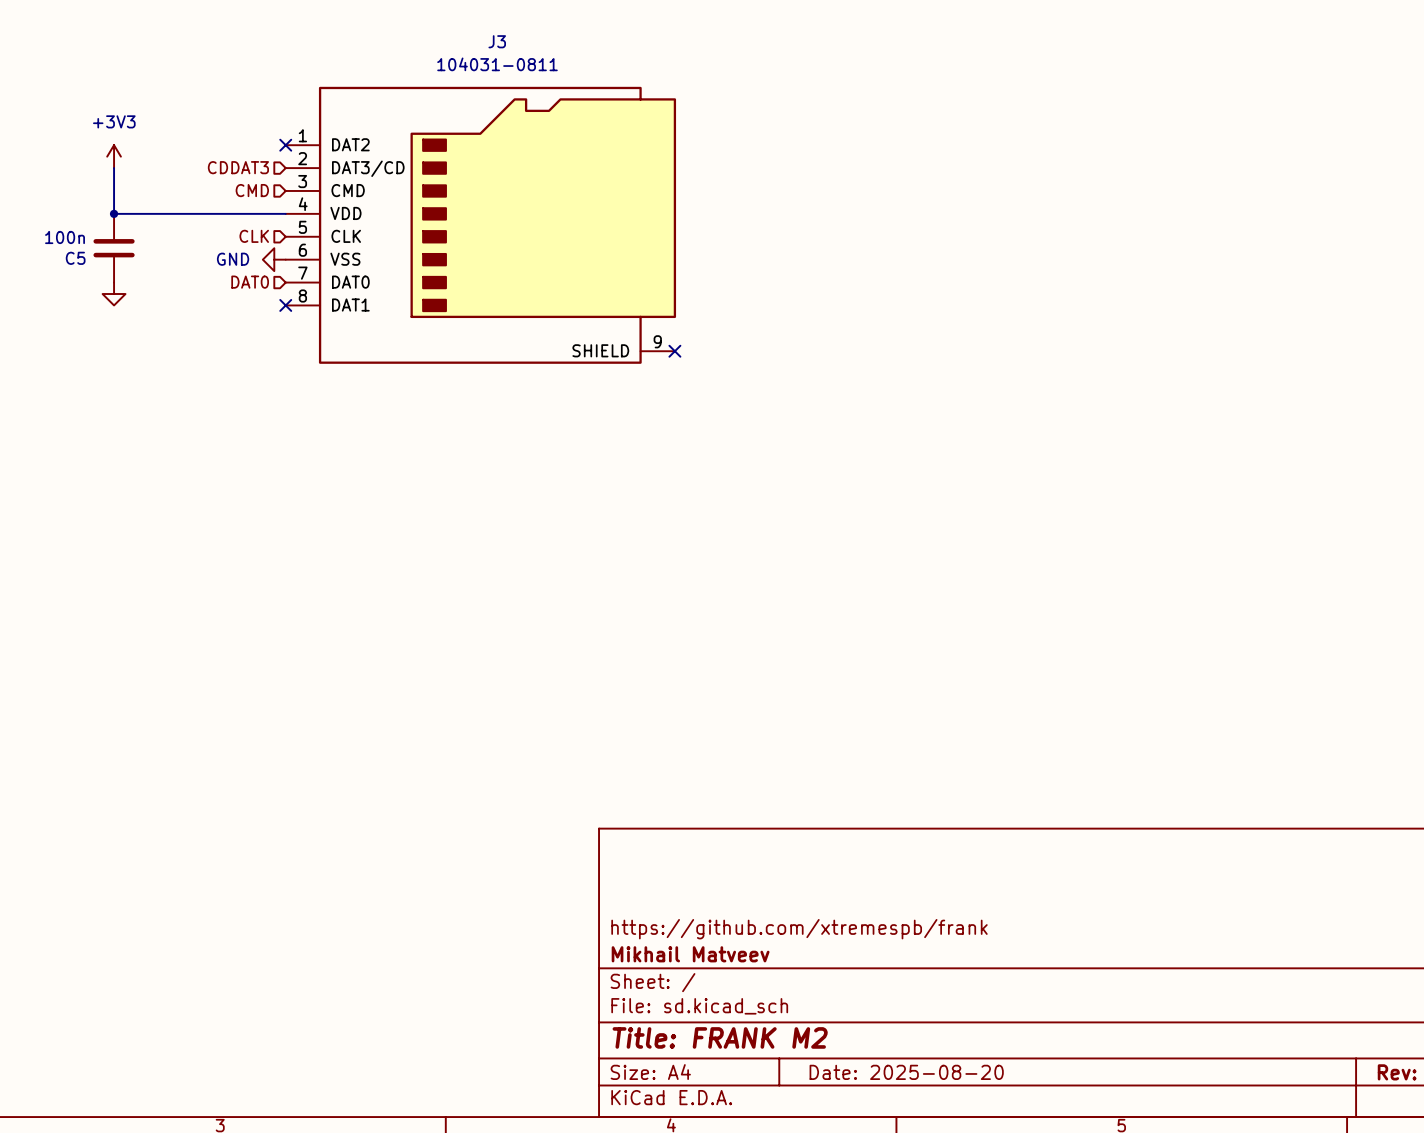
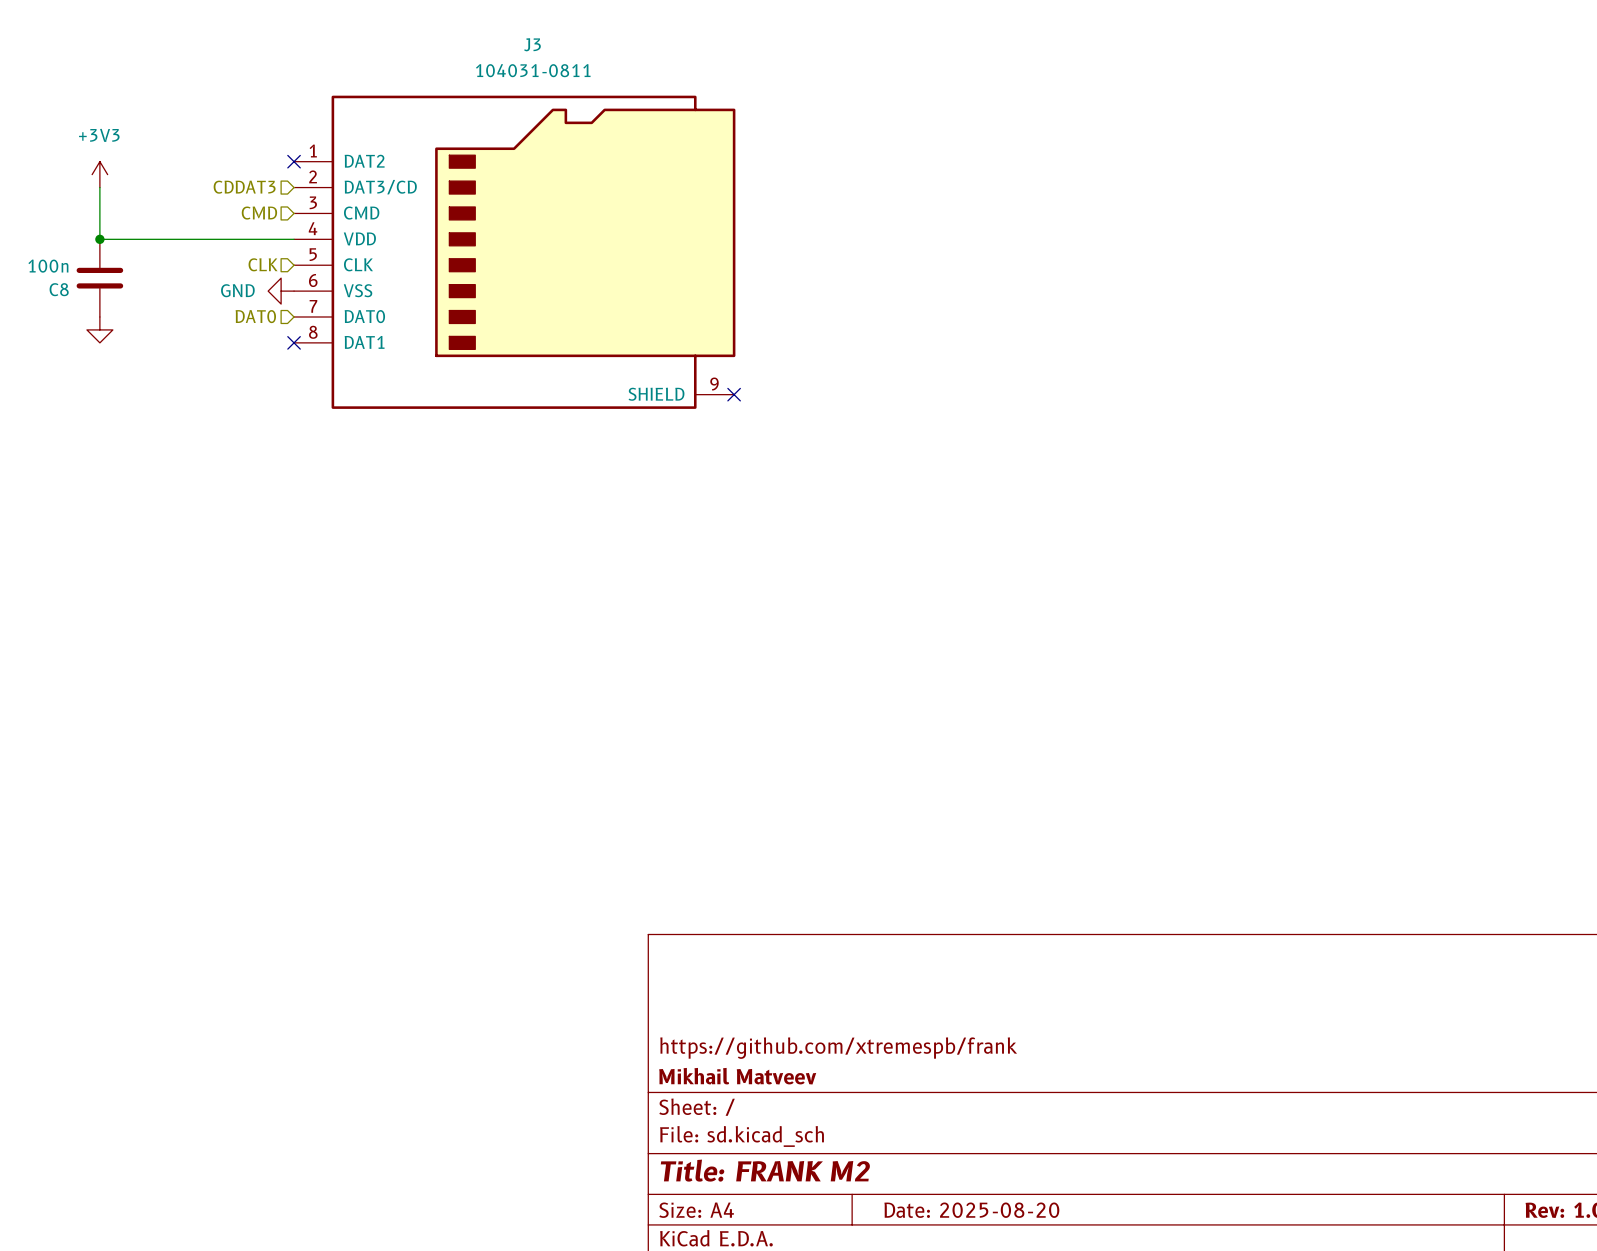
C5 name: C5 (75, 258) -> C8 (59, 289)

